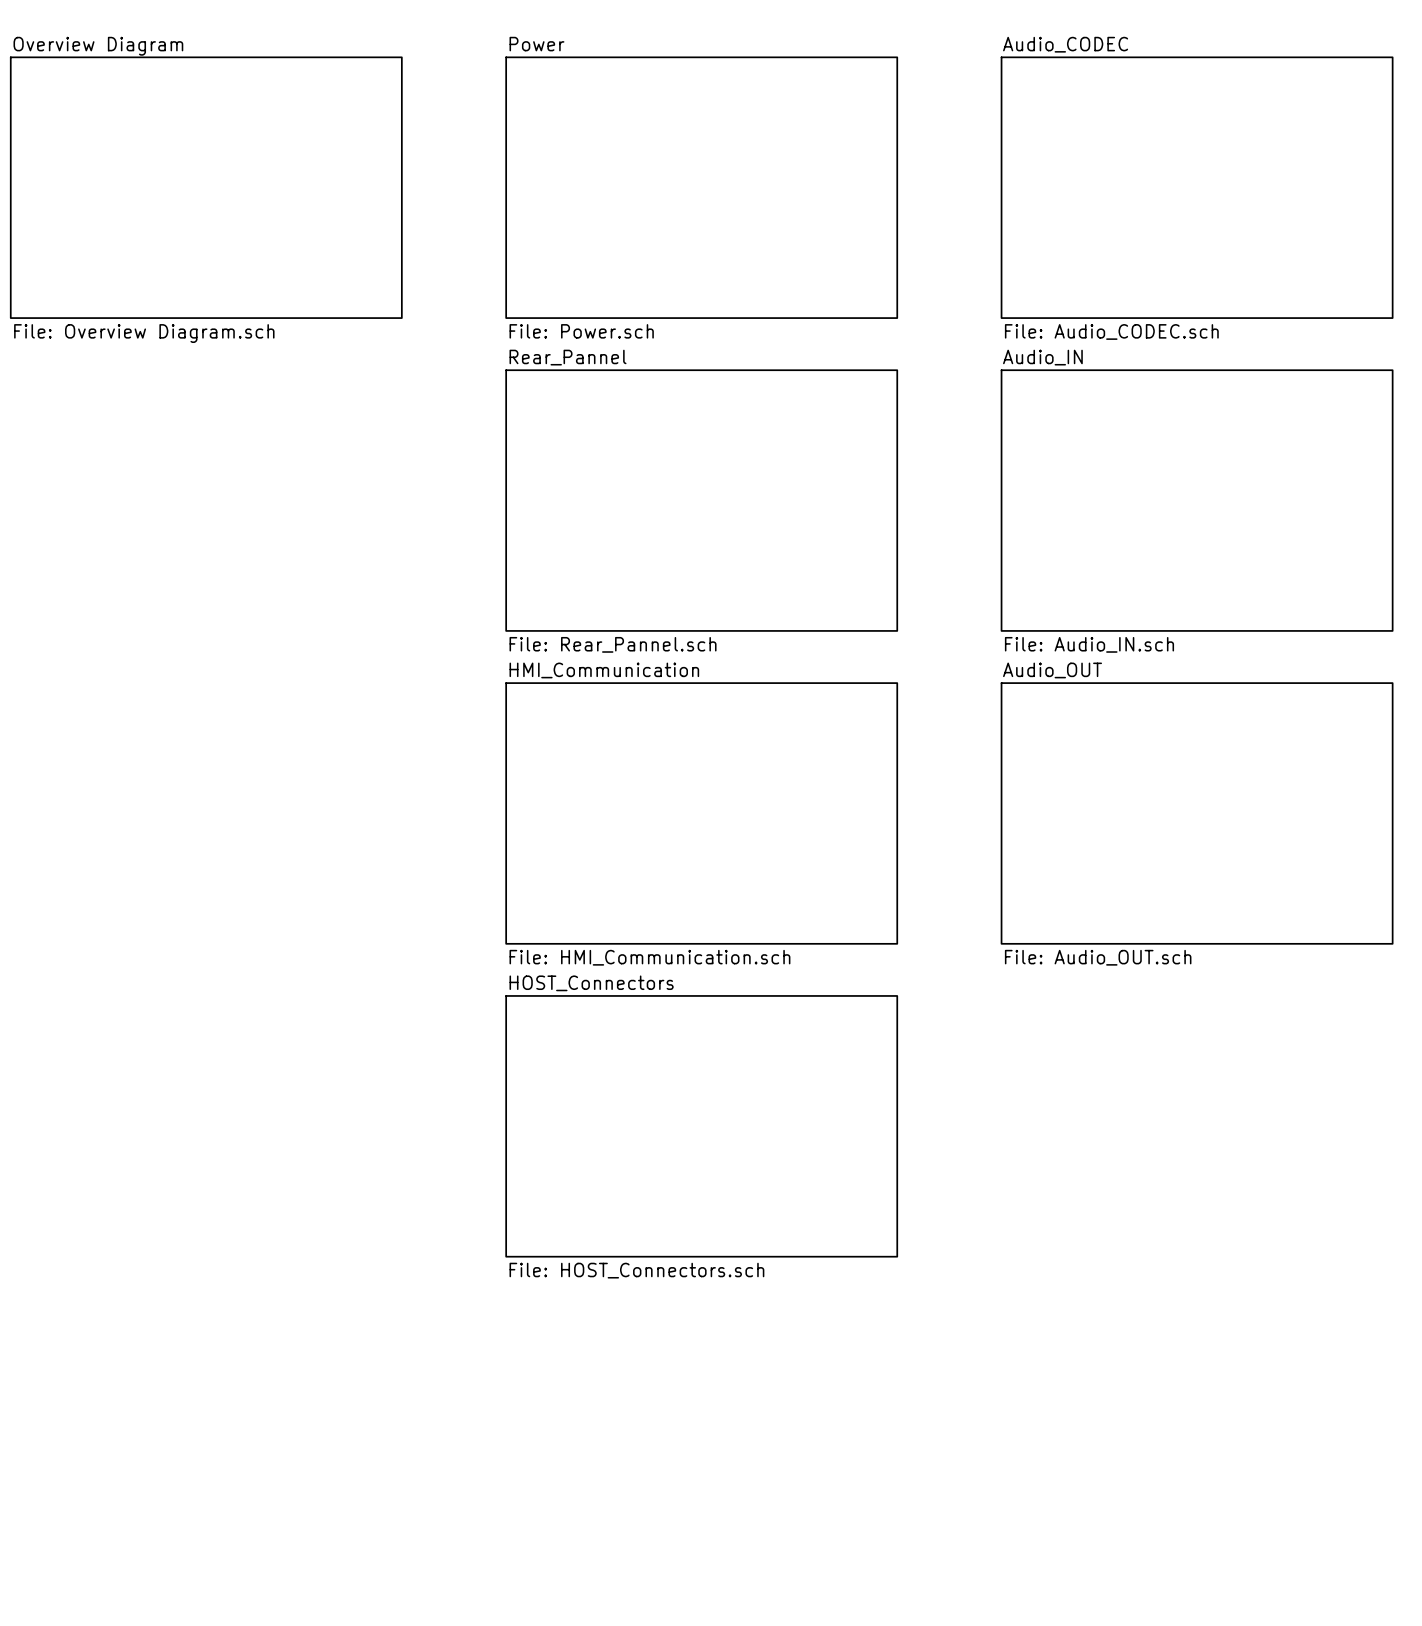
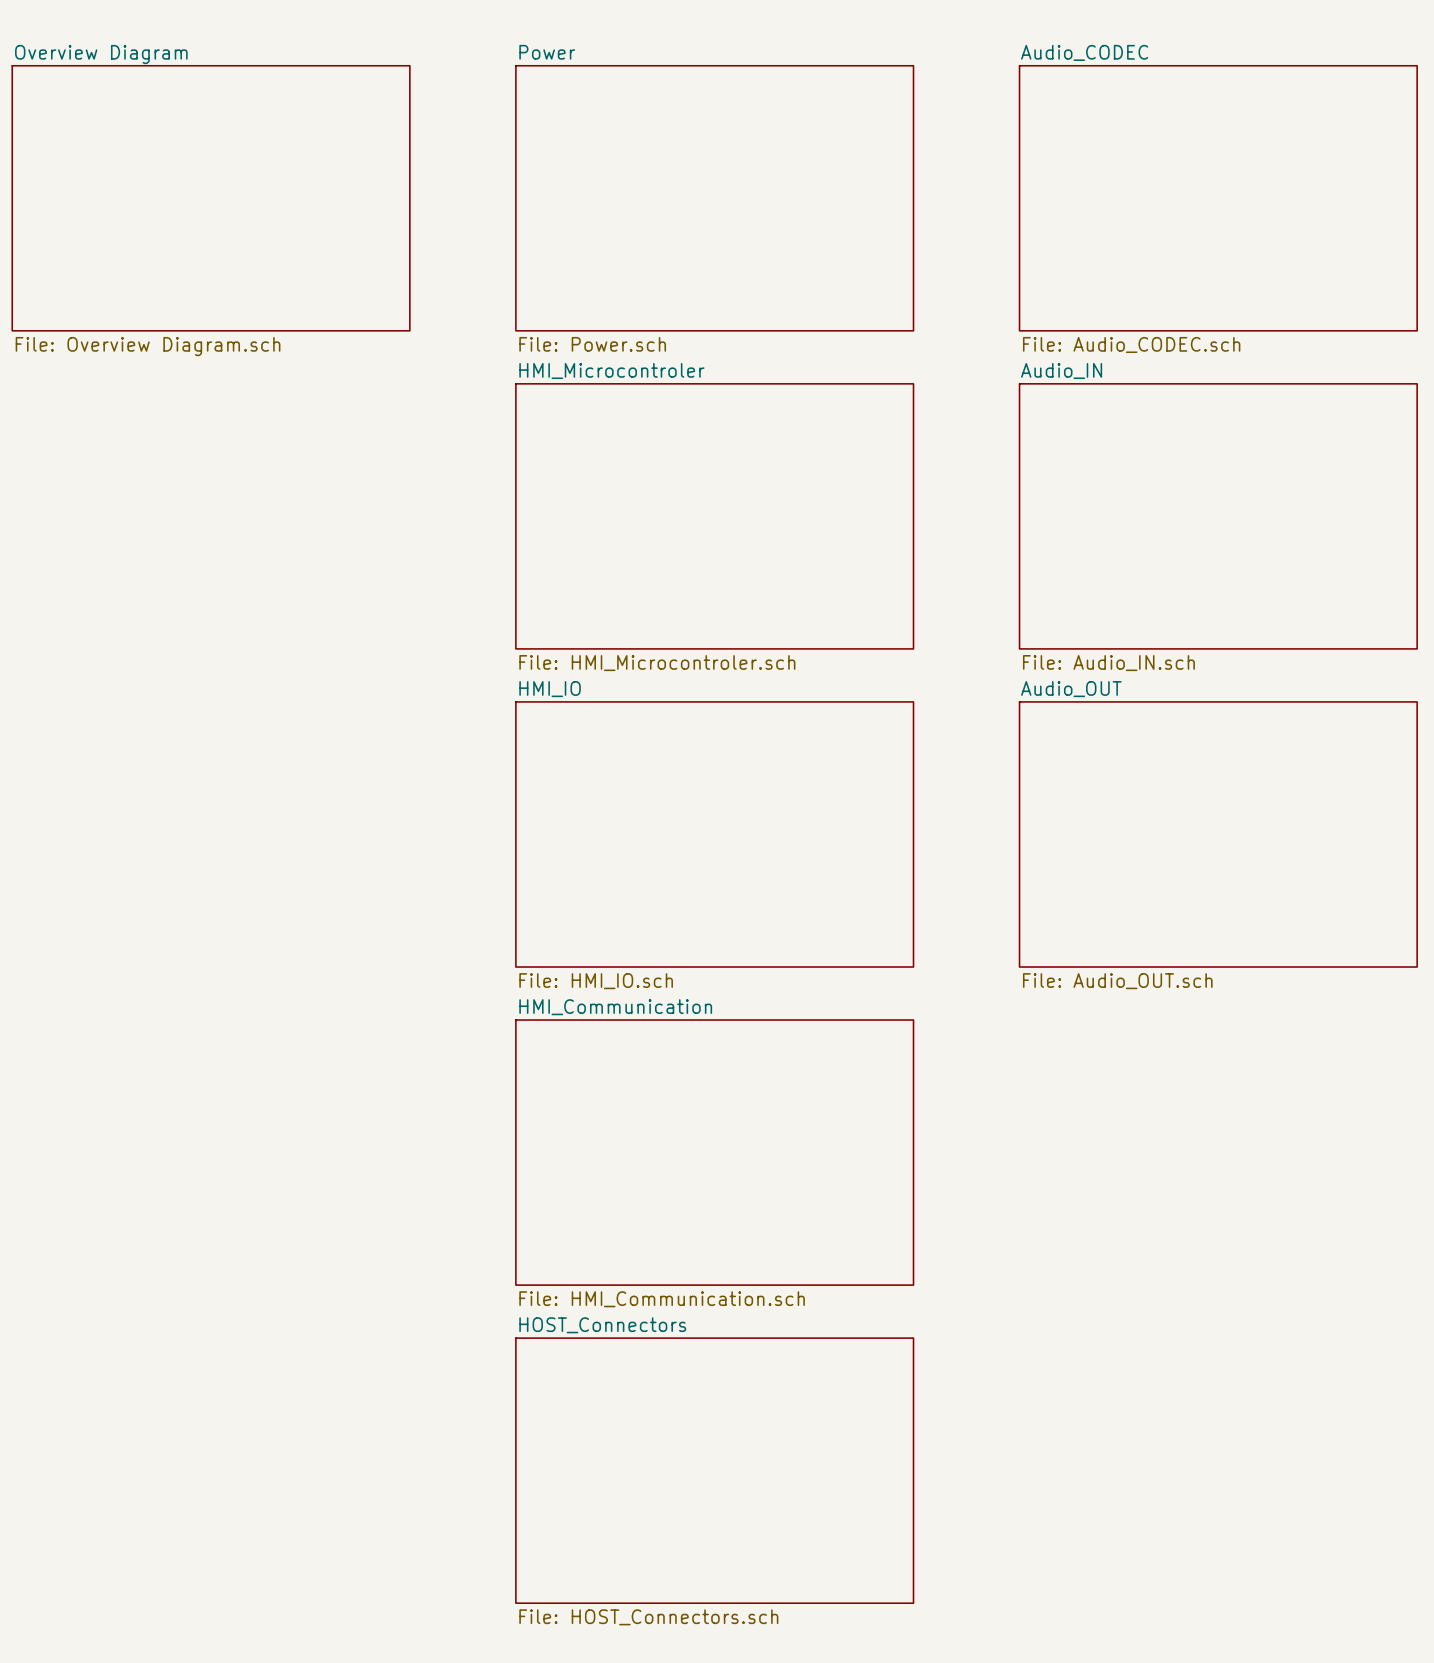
sheet Rear_Pannel name: Rear_Pannel (568, 357) -> HMI_Microcontroler (611, 371)
sheet Rear_Pannel value: File: Rear_Pannel.sch (613, 644) -> File: HMI_Microcontroler.sch (657, 663)
sheet HMI_Communication name: HMI_Communication (604, 670) -> HMI_IO (550, 689)
sheet HMI_Communication value: File: HMI_Communication.sch (649, 957) -> File: HMI_IO.sch (596, 981)
sheet HOST_Connectors name: HOST_Connectors (591, 983) -> HMI_Communication (615, 1007)
sheet HOST_Connectors value: File: HOST_Connectors.sch (636, 1270) -> File: HMI_Communication.sch (662, 1299)
sheet HOST_Connectors: none -> File: HOST_Connectors.sch (714, 1470)

